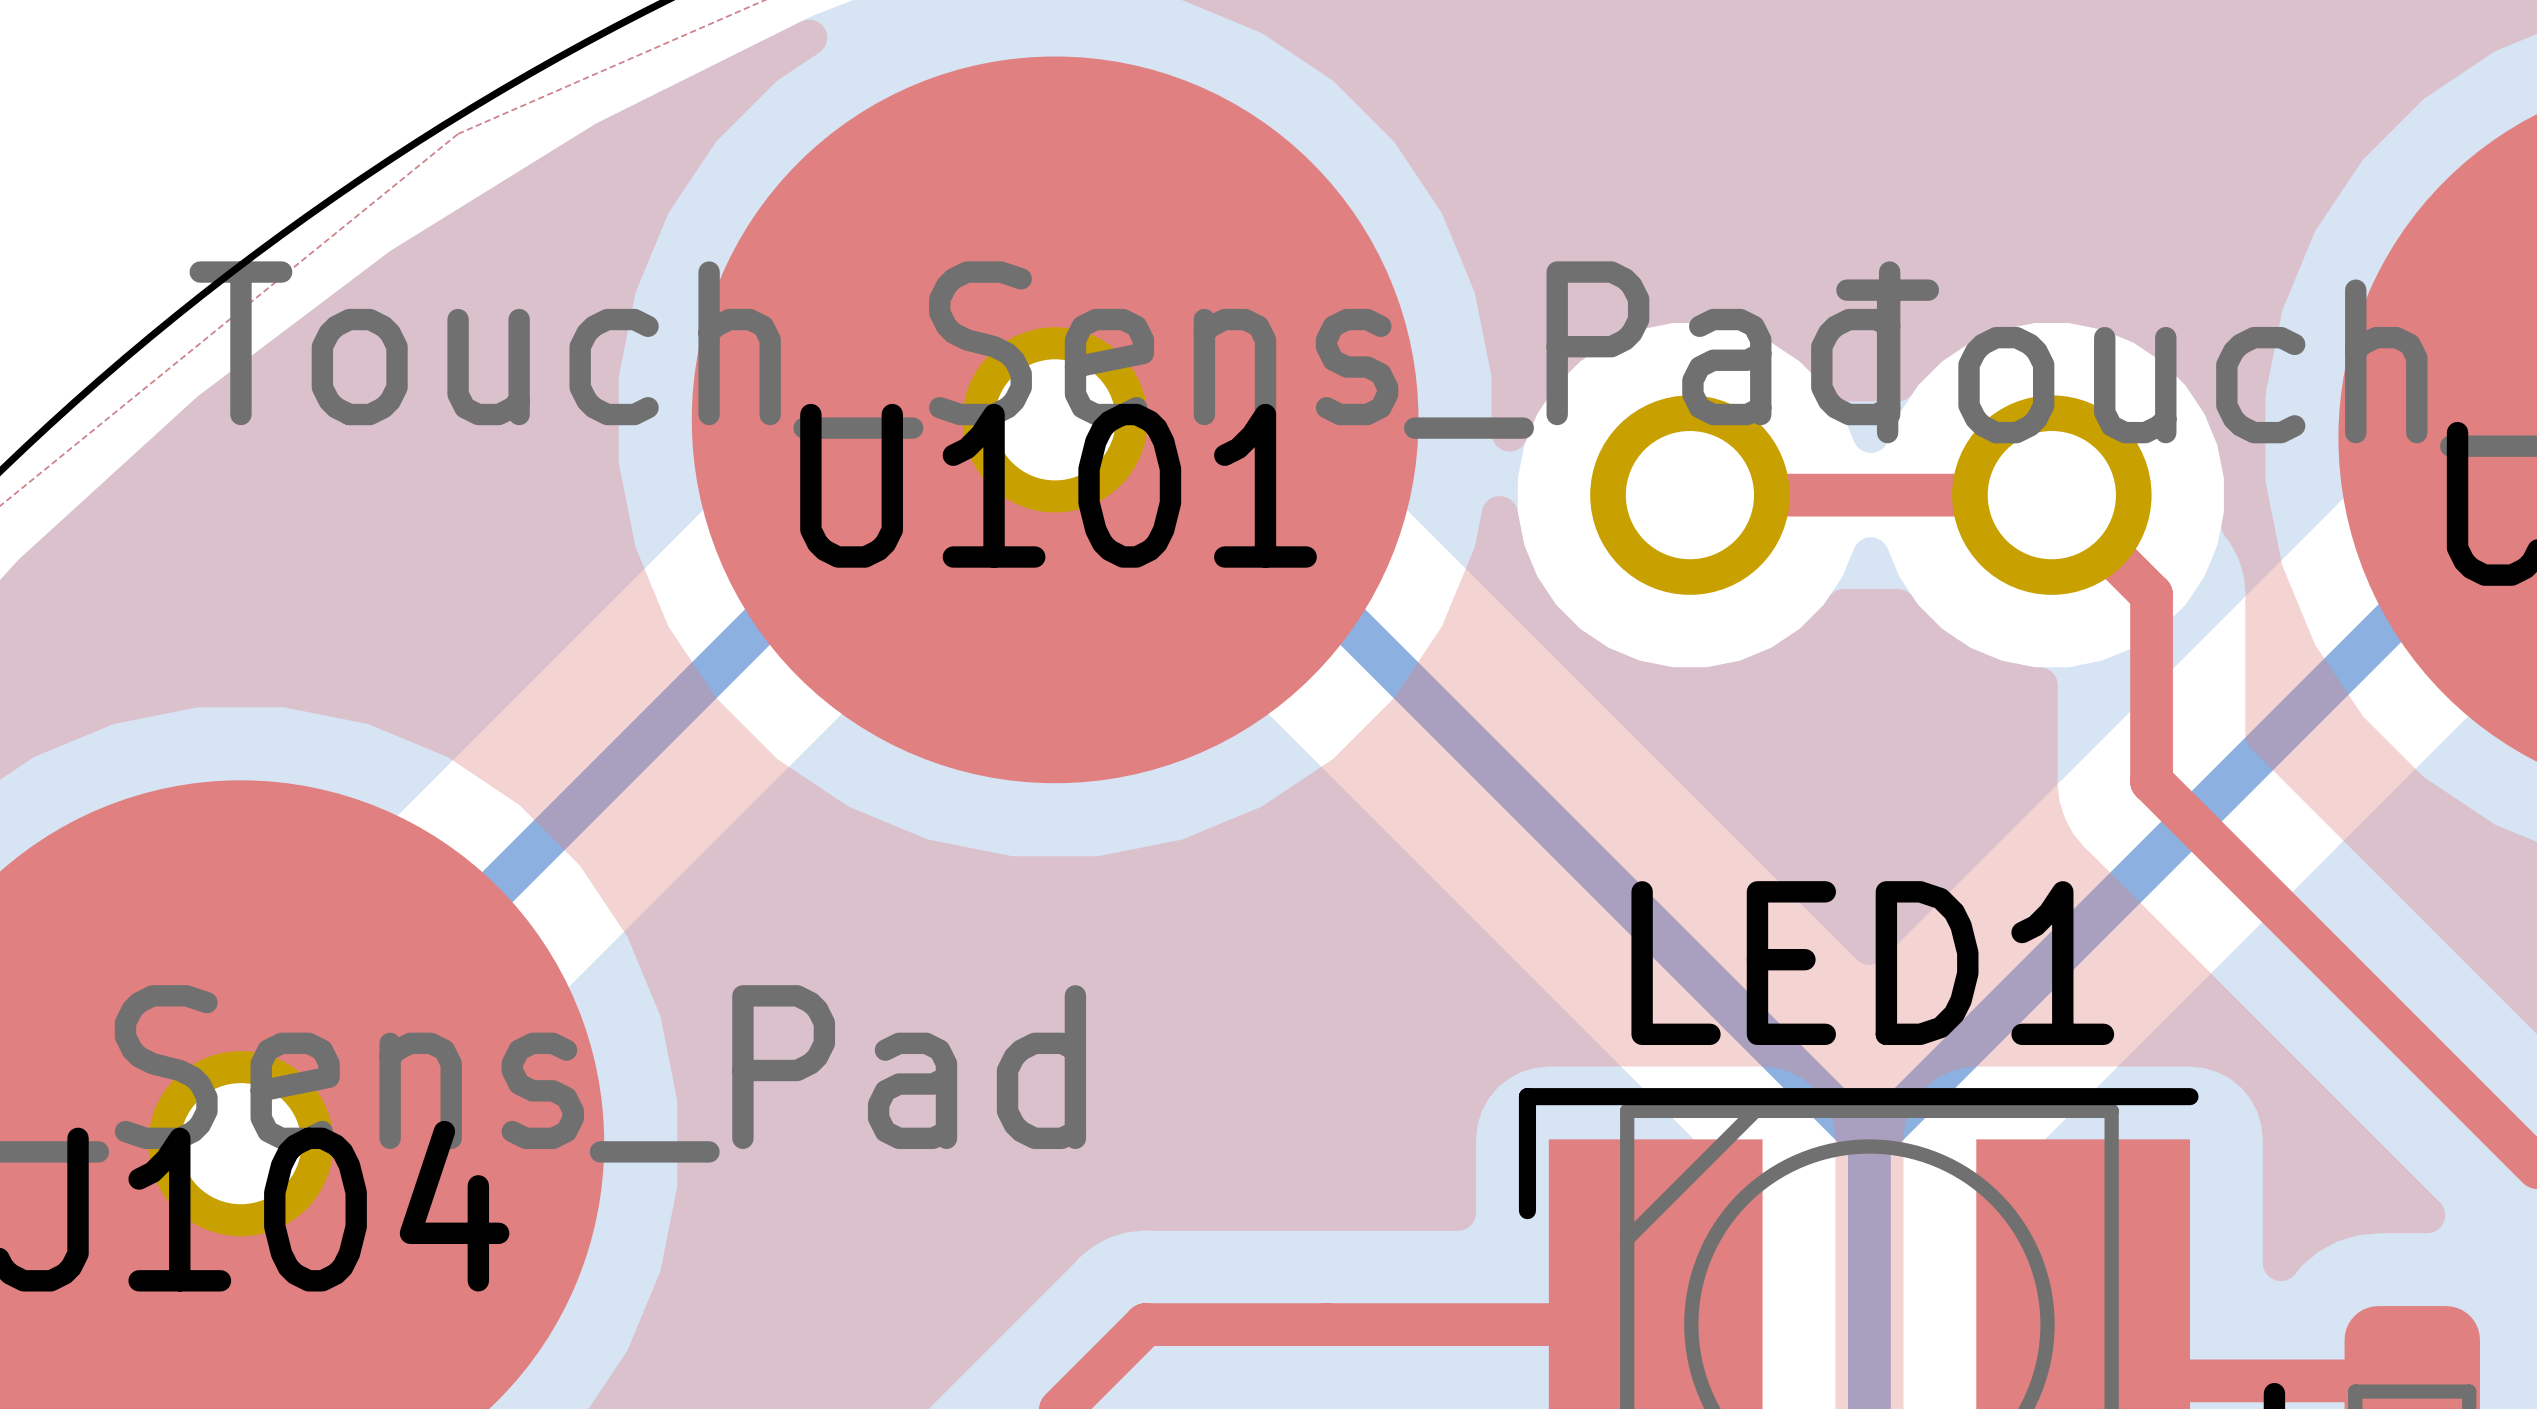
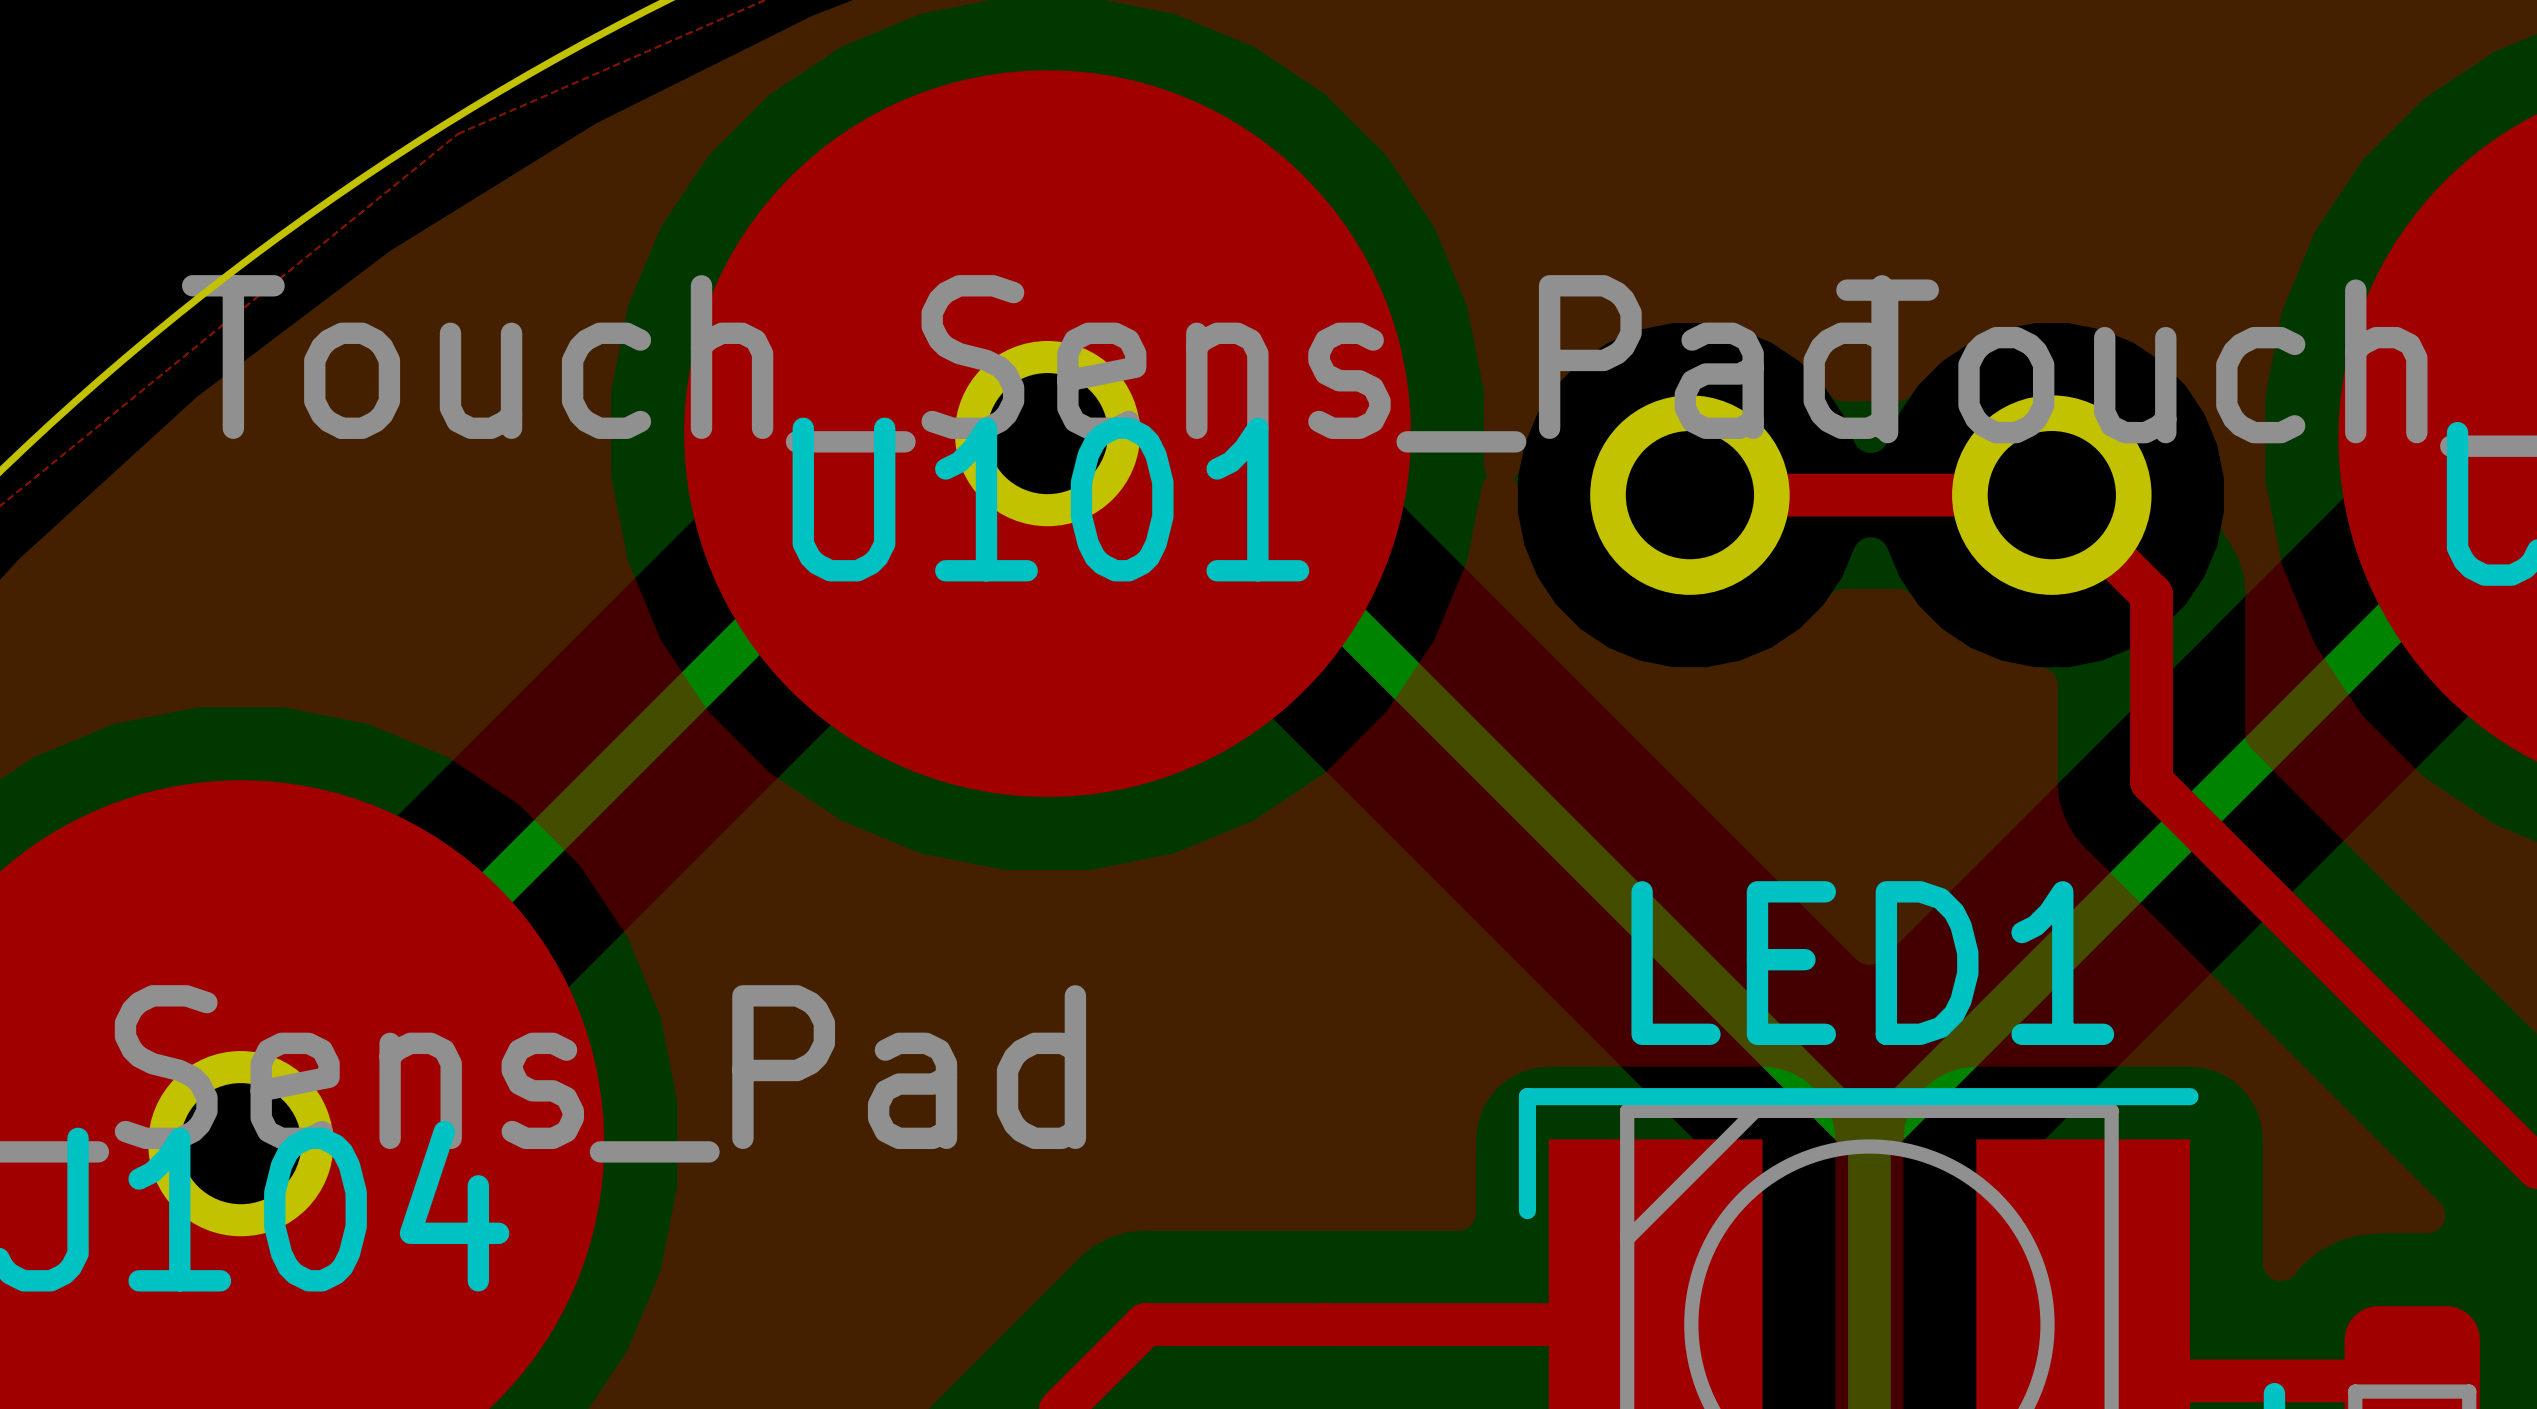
U101 position: (1055, 419) -> (1047, 433)

